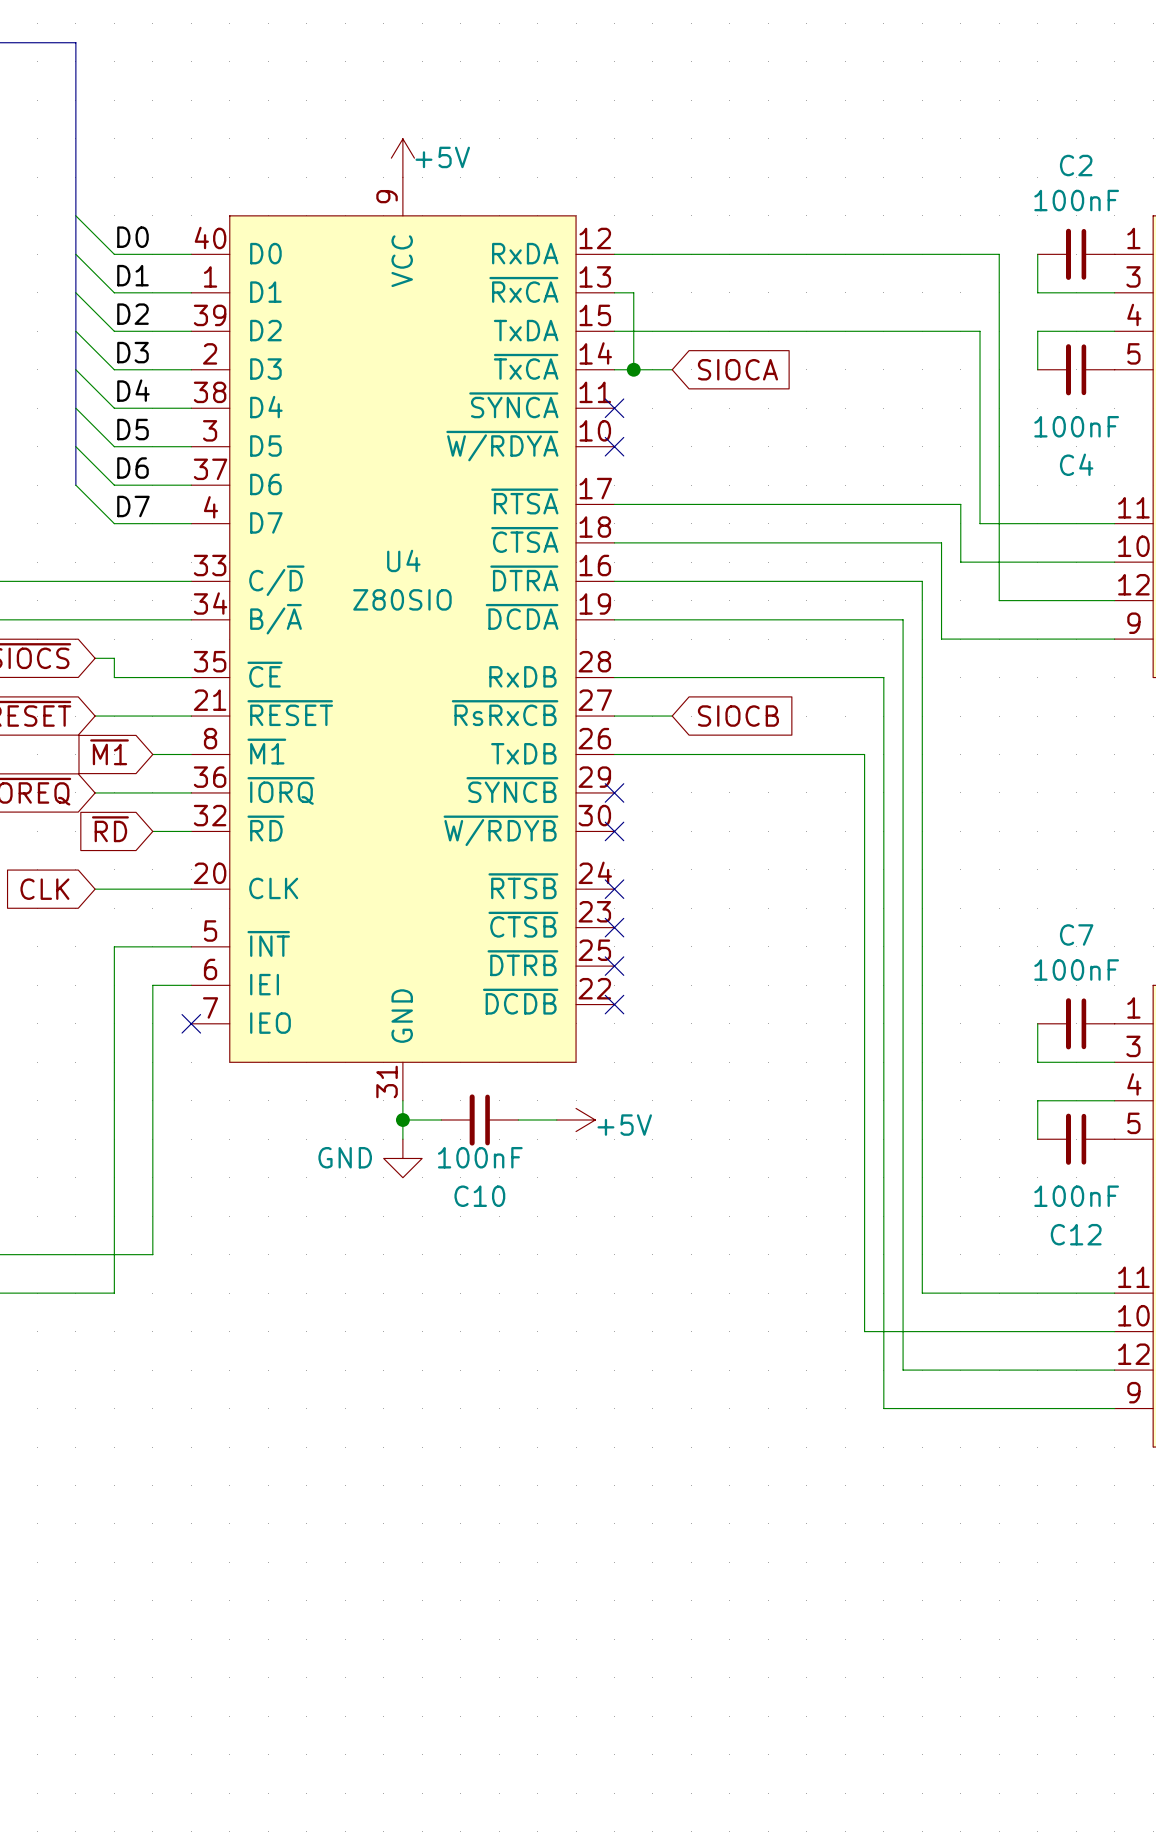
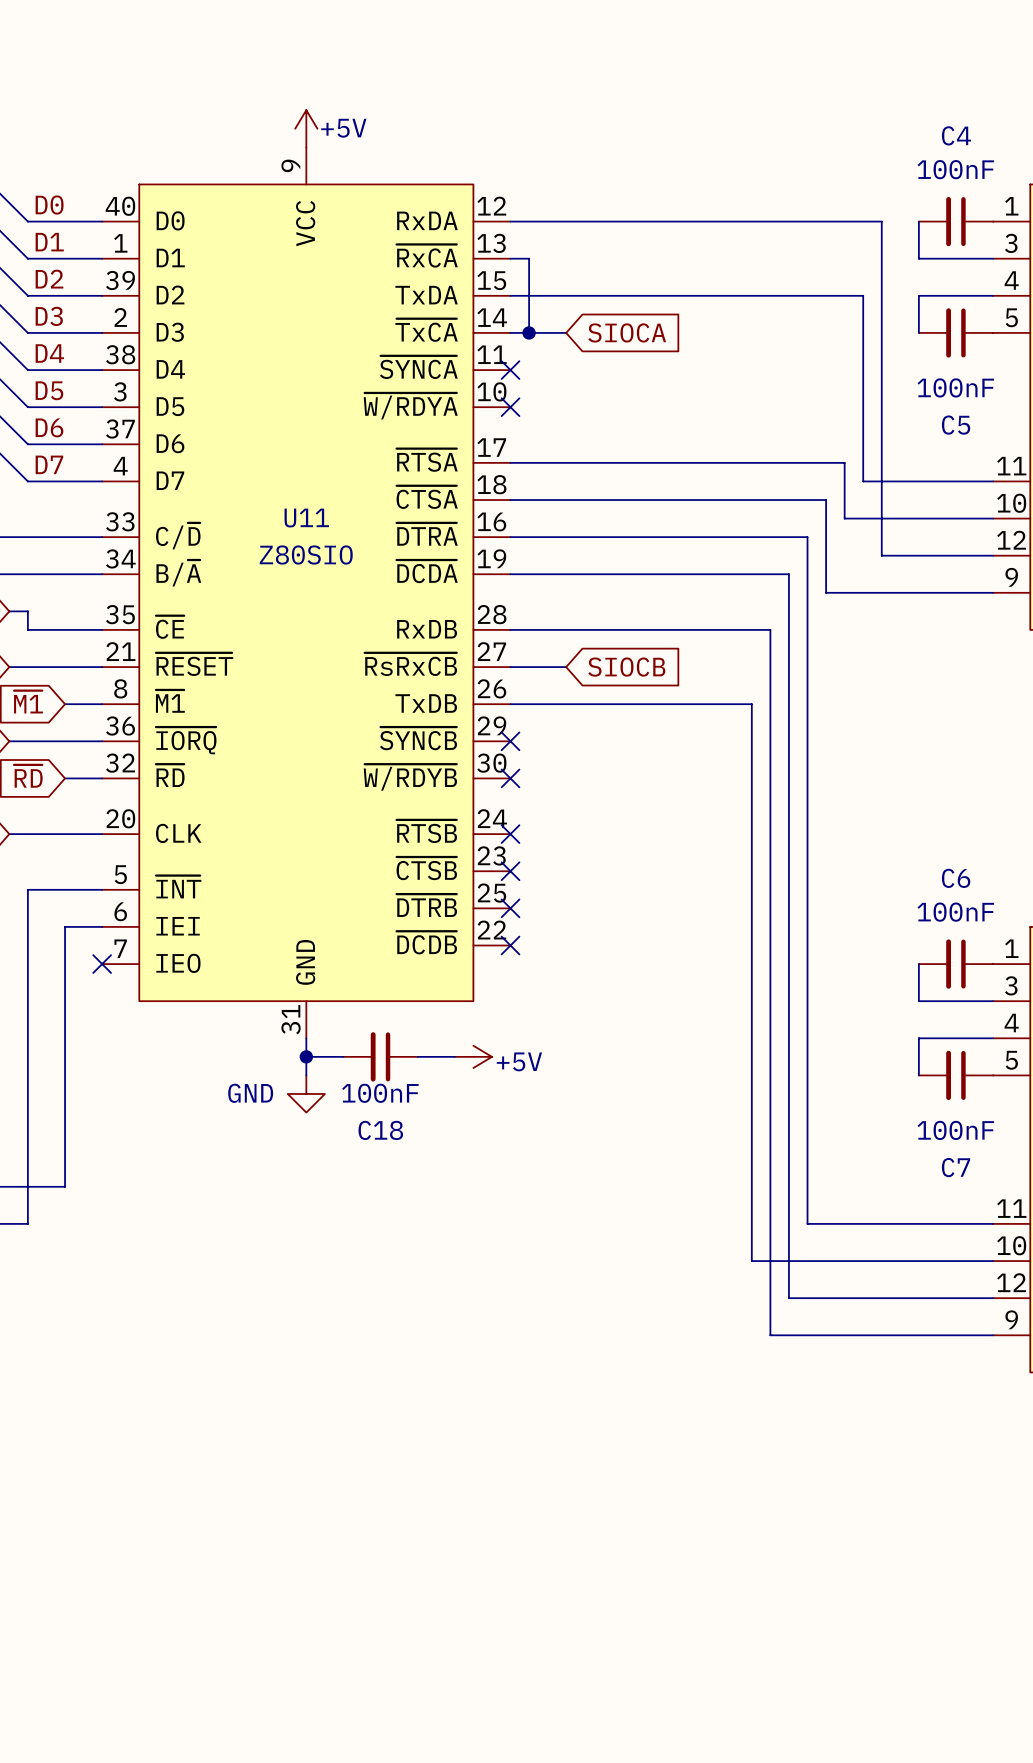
C2 name: C2 (1076, 165) -> C4 (956, 135)
C4 name: C4 (1076, 464) -> C5 (956, 425)
U4 name: U4 (403, 560) -> U11 (306, 518)
C7 name: C7 (1076, 934) -> C6 (956, 878)
C10 name: C10 (479, 1196) -> C18 (380, 1130)
C12 name: C12 (1076, 1234) -> C7 (956, 1167)

